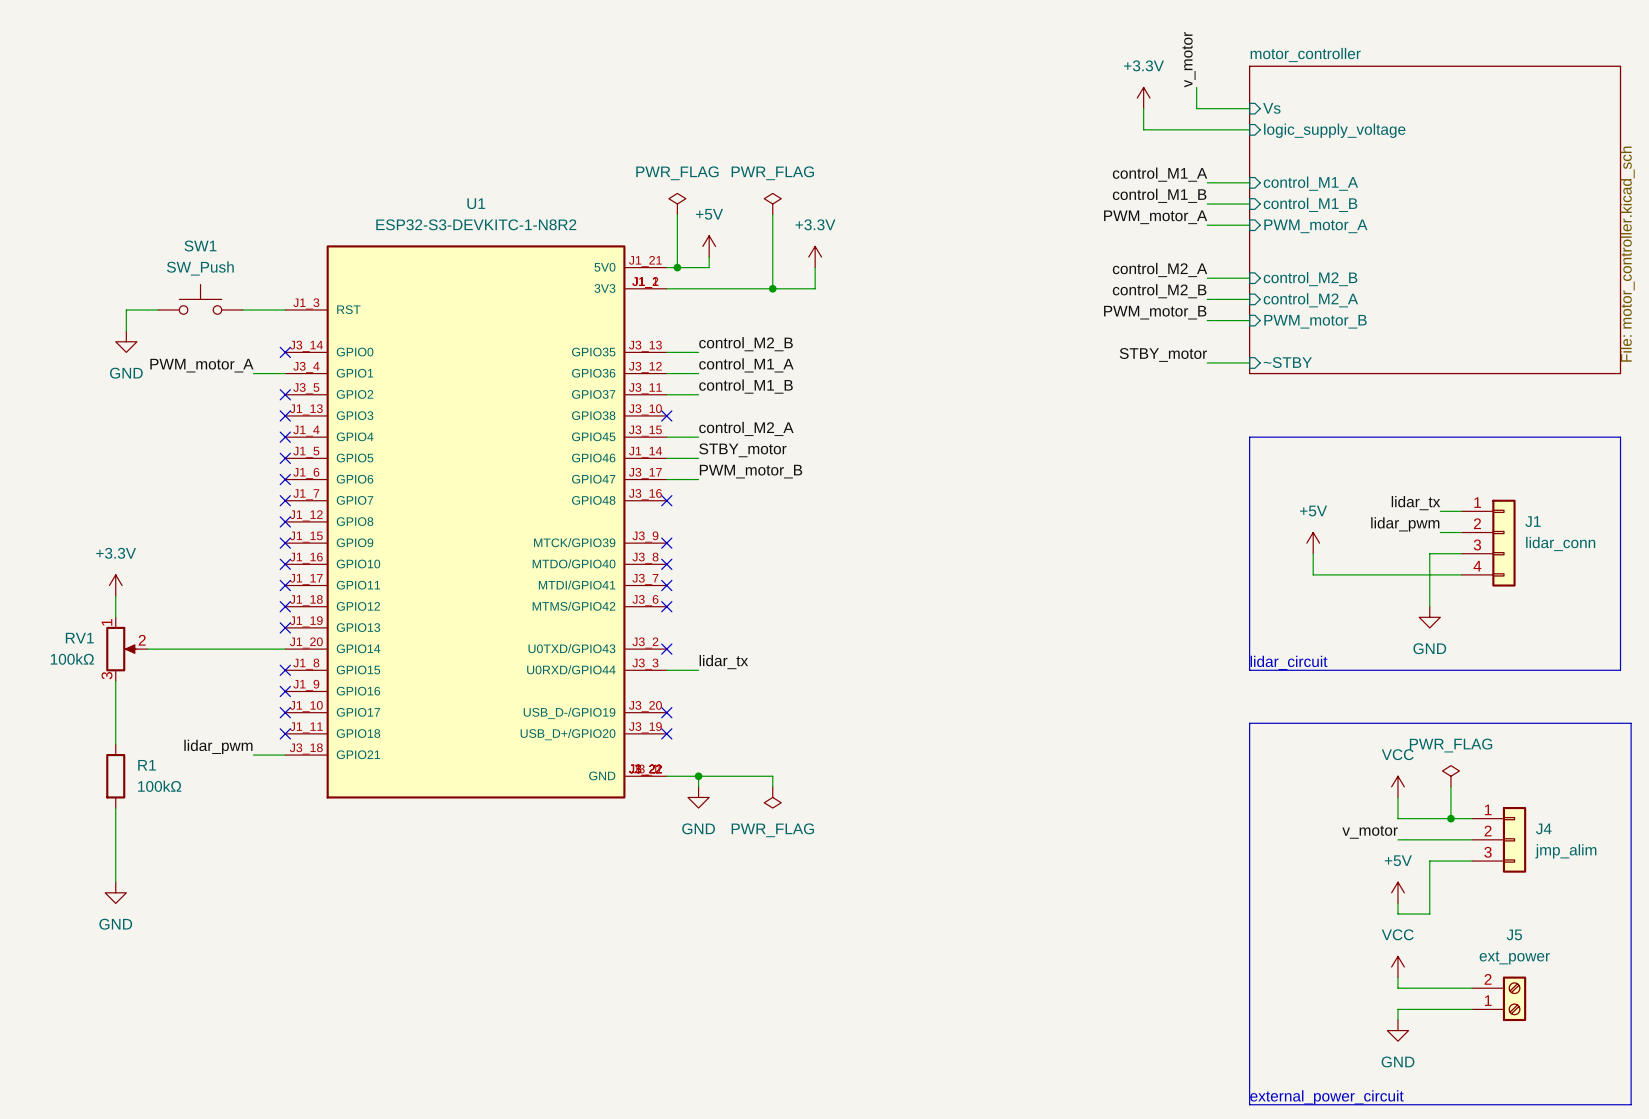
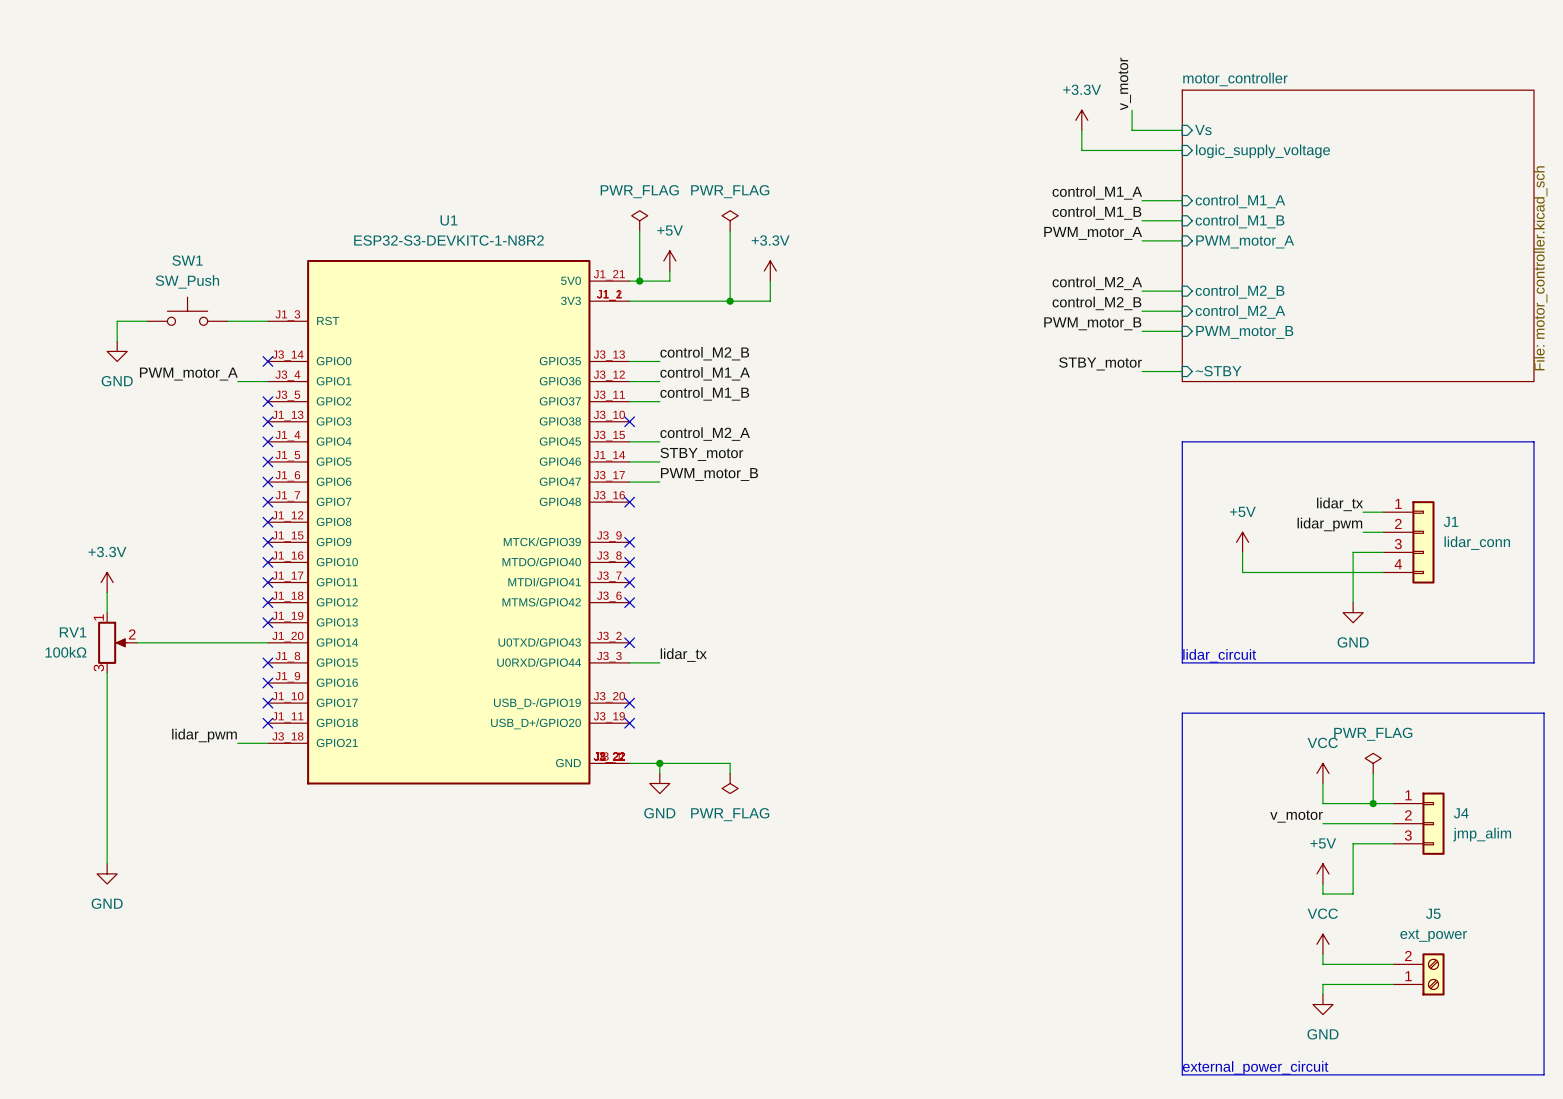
wire: none -> (107, 733) (107, 793)
R1: 100kΩ (115, 776) -> none

